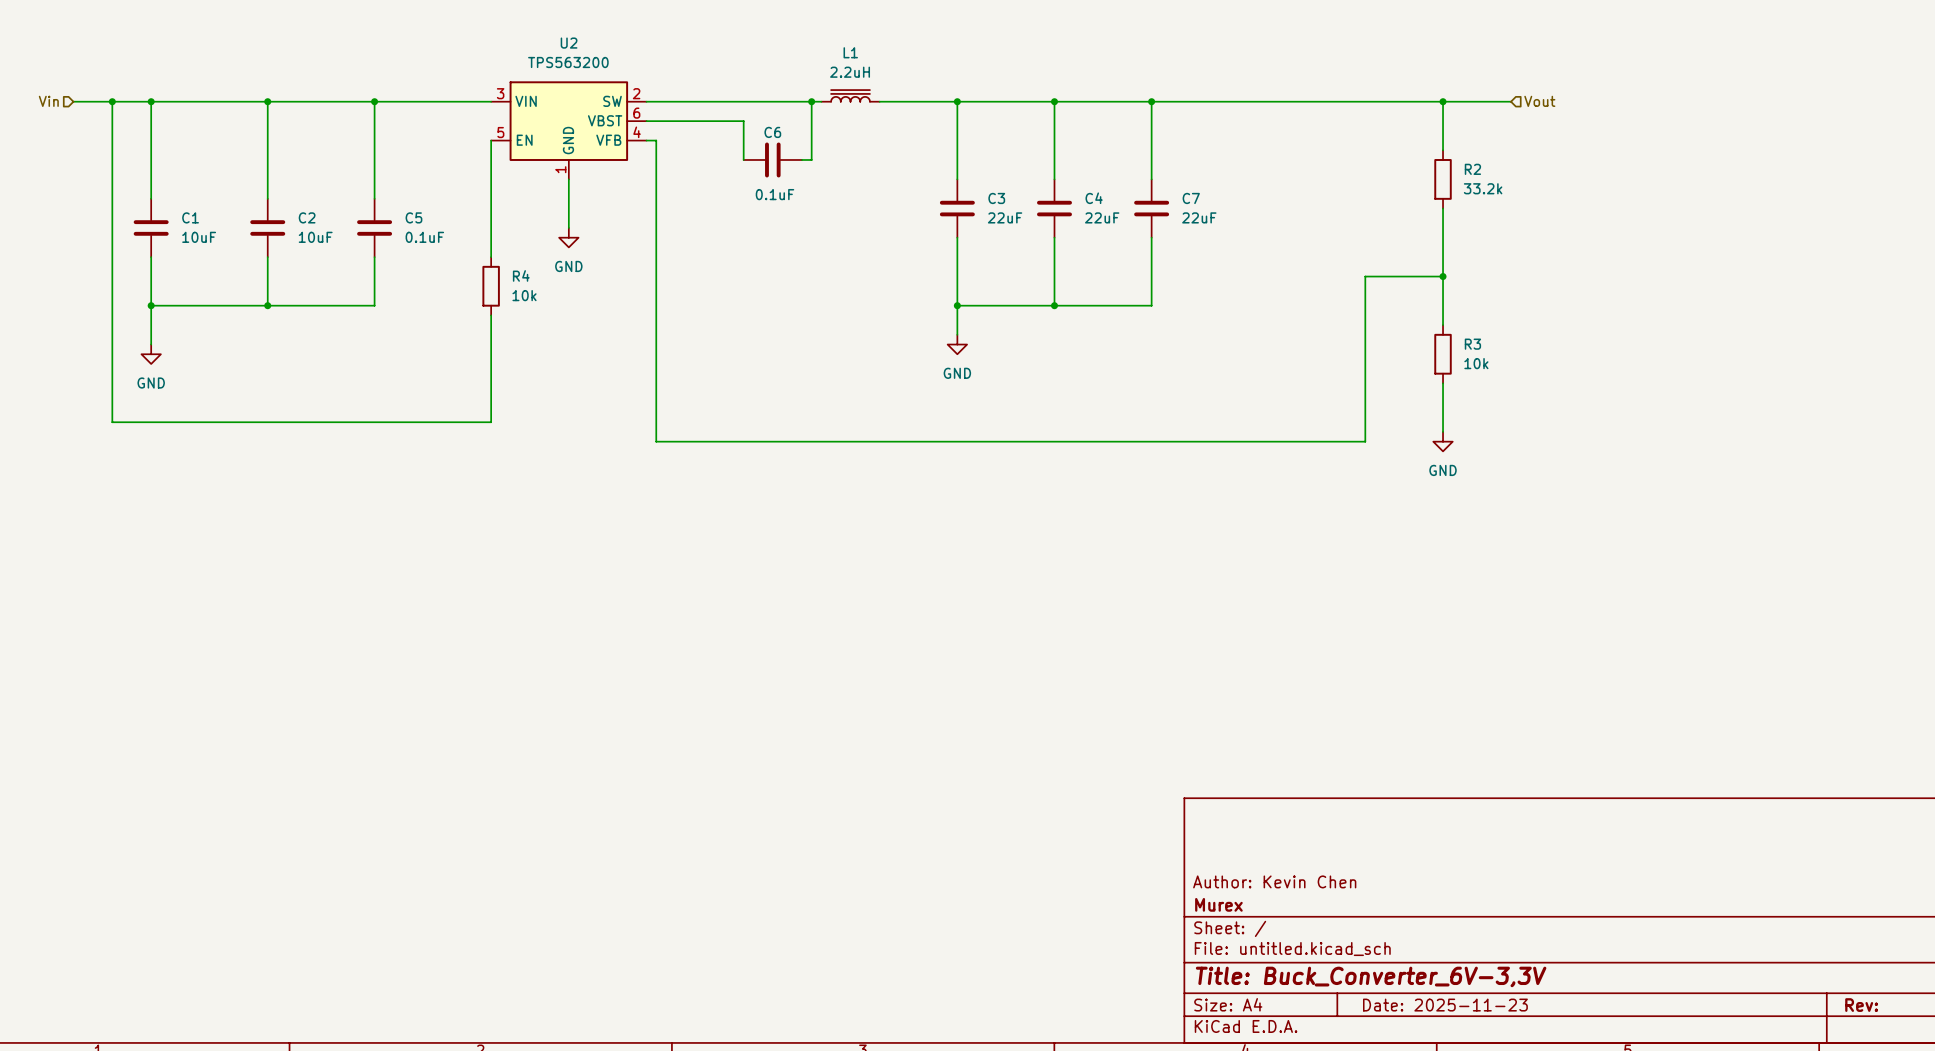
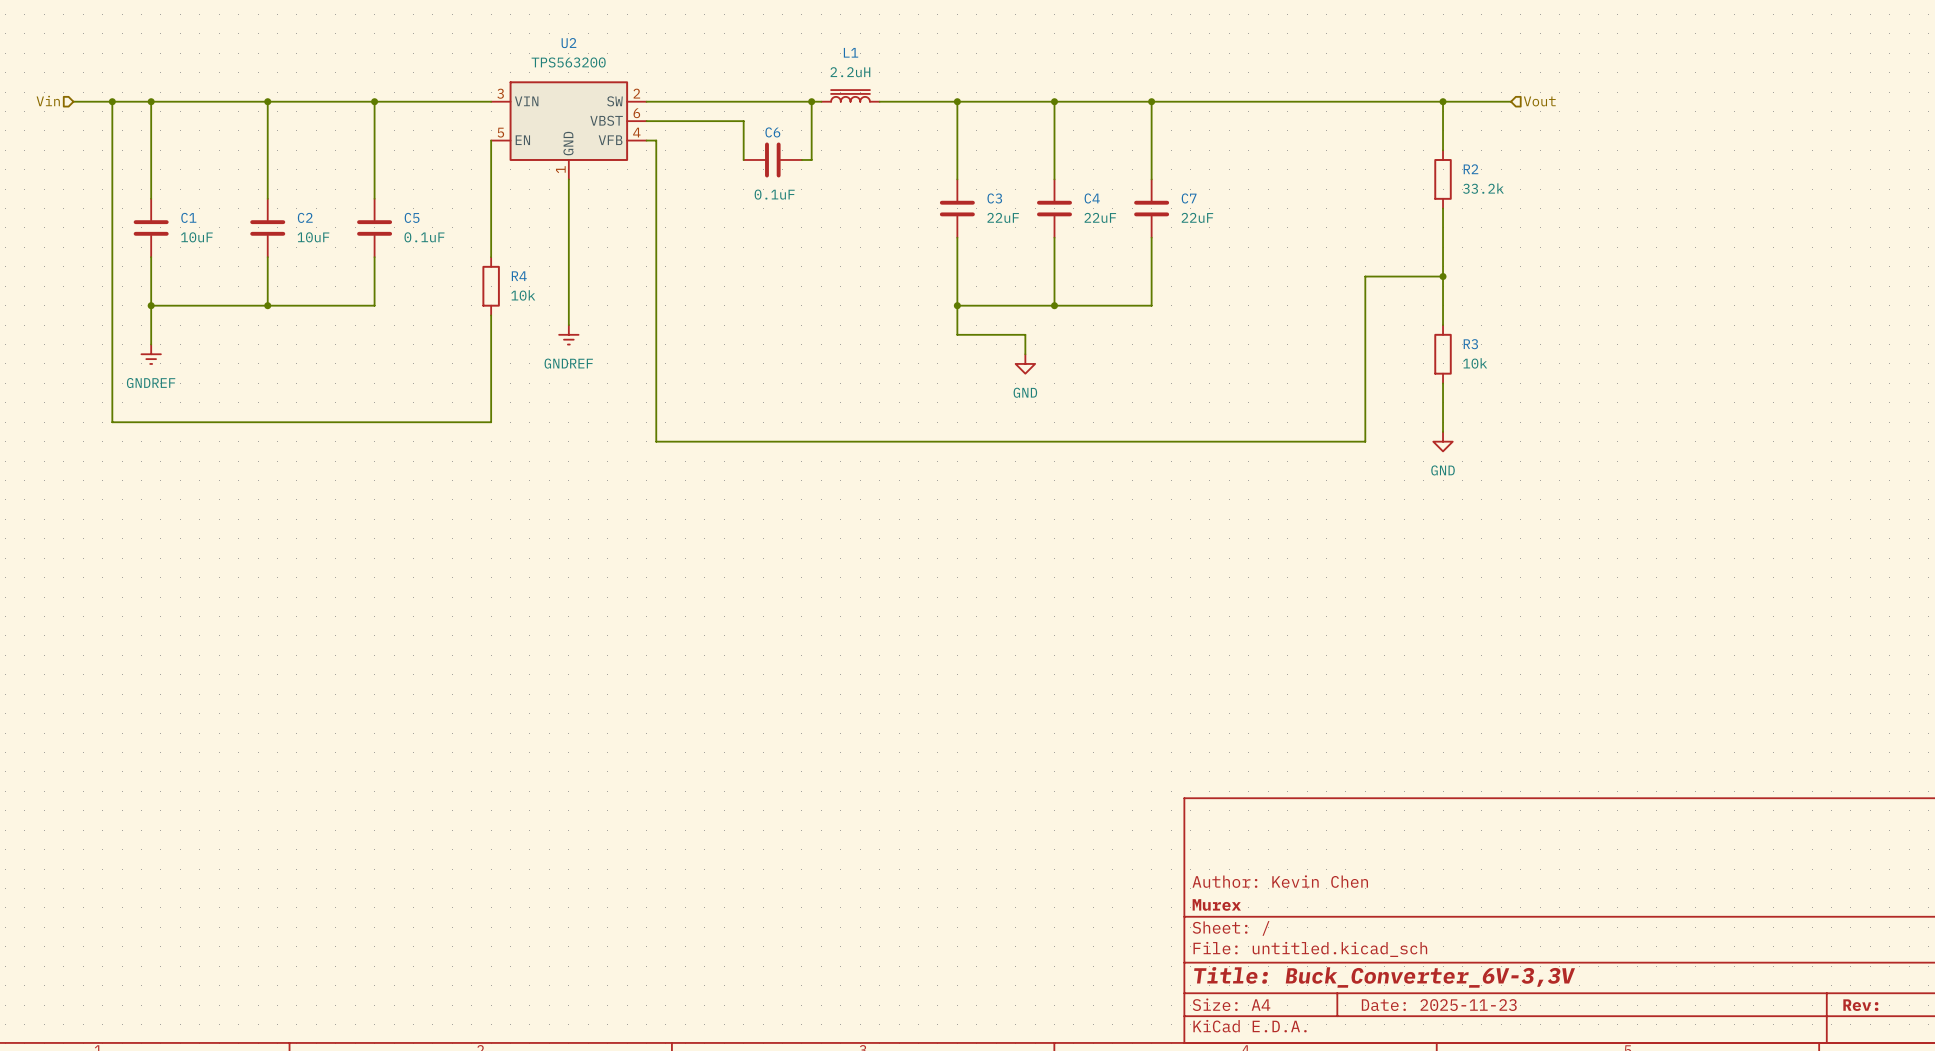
wire: none -> (568, 227) (568, 325)
power symbol: GND (568, 237) -> none
power symbol: none -> GNDREF (568, 334)
wire: none -> (957, 334) (1025, 334) (1025, 354)
power symbol position: GND (957, 344) -> GND (1025, 363)
power symbol: GND (151, 354) -> GNDREF (151, 354)

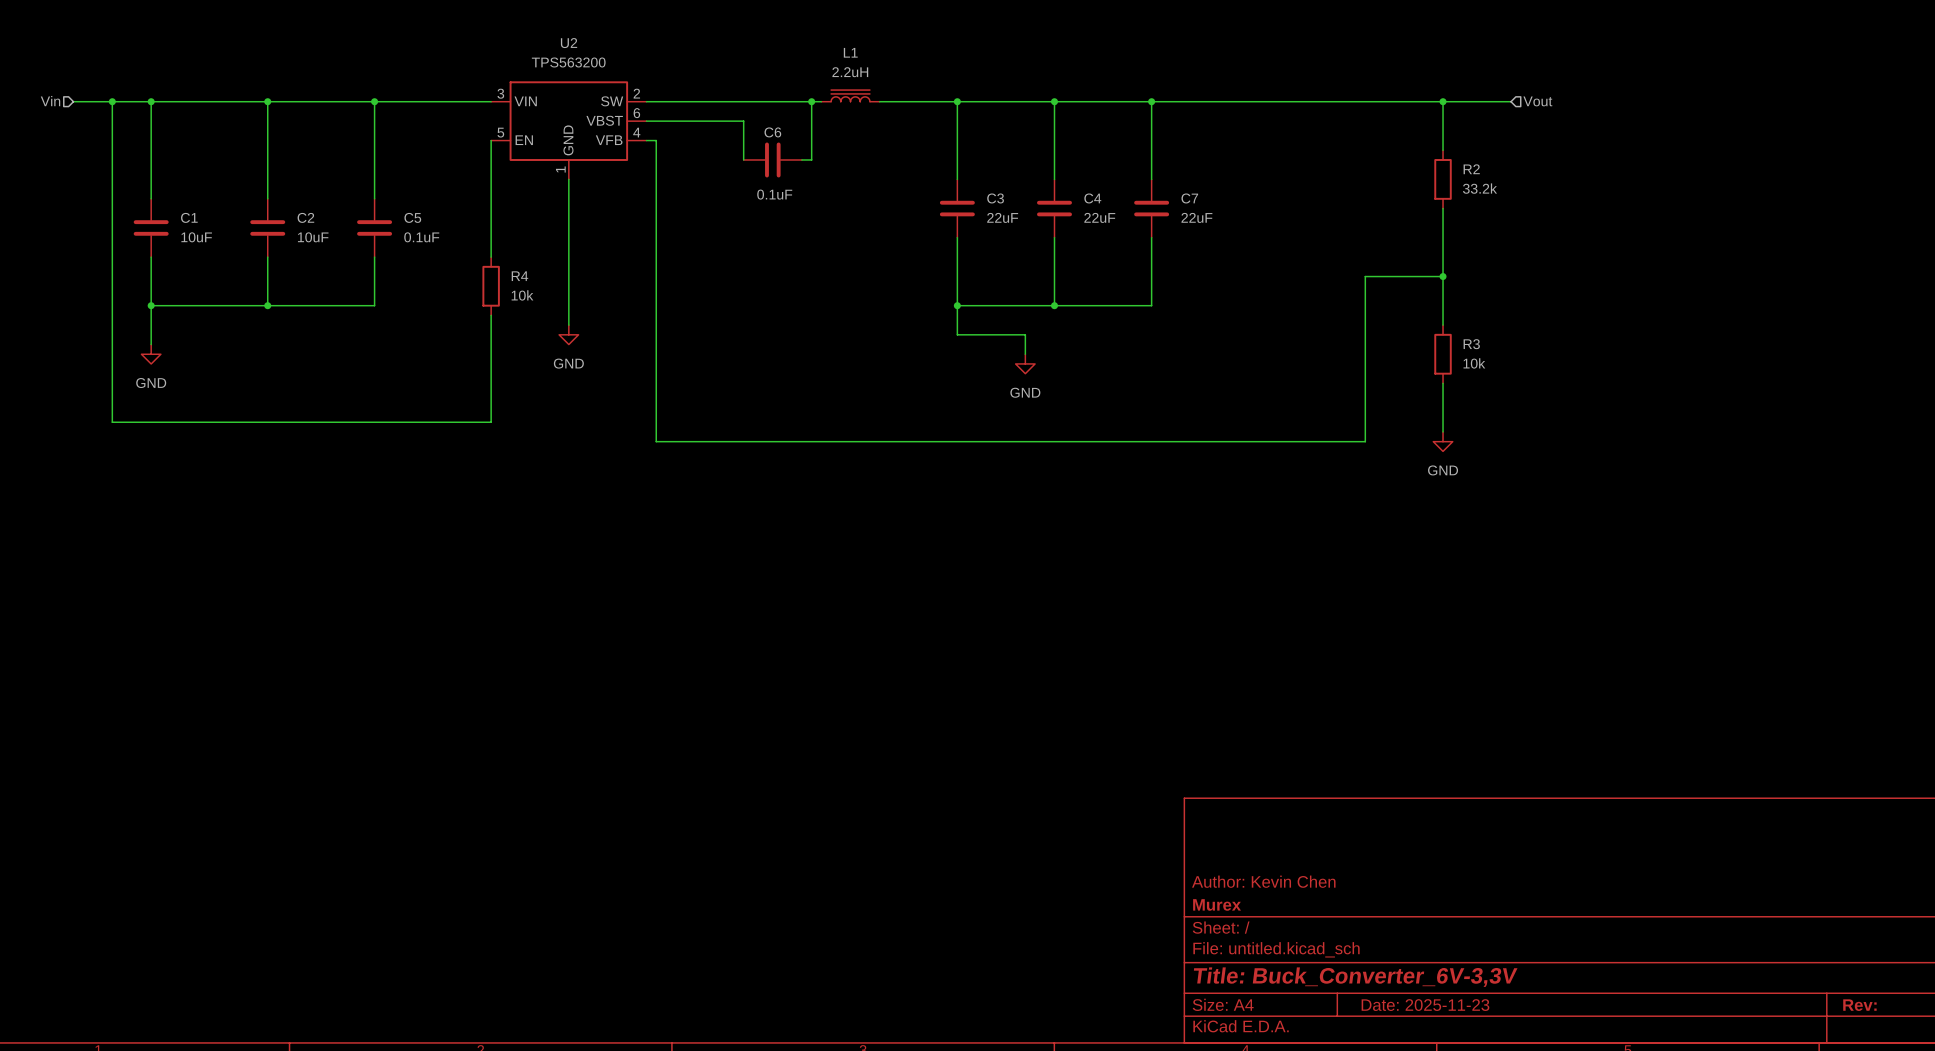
power symbol: GNDREF (568, 334) -> GND (568, 334)
power symbol: GNDREF (151, 354) -> GND (151, 354)

